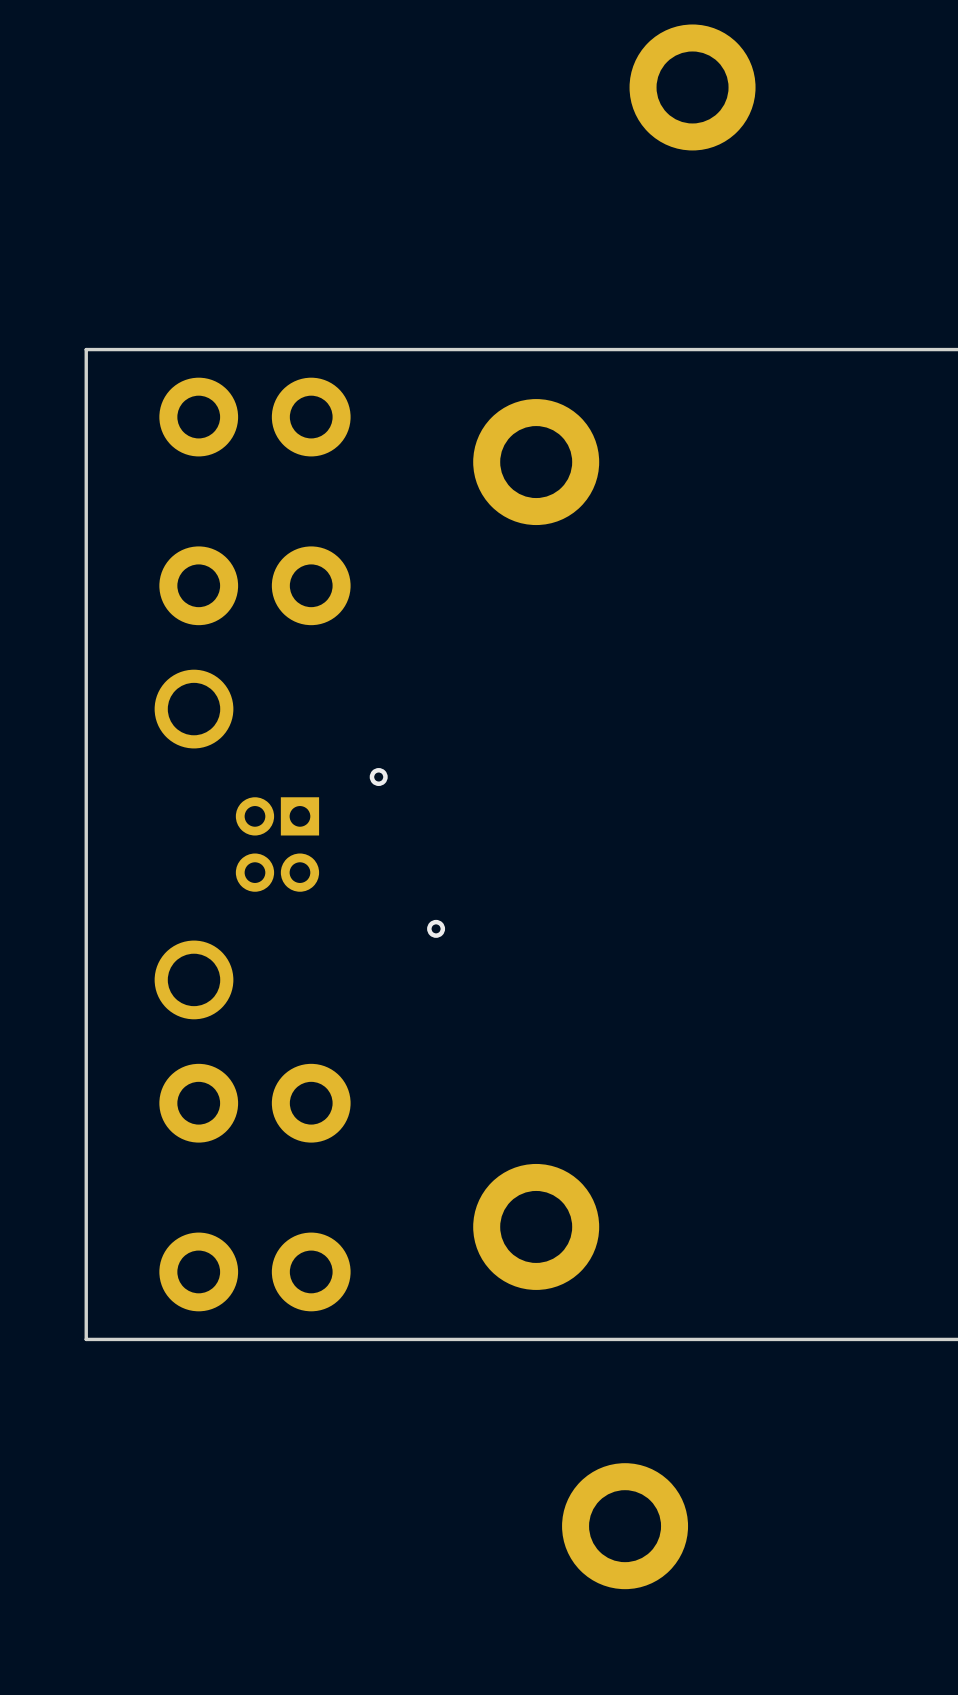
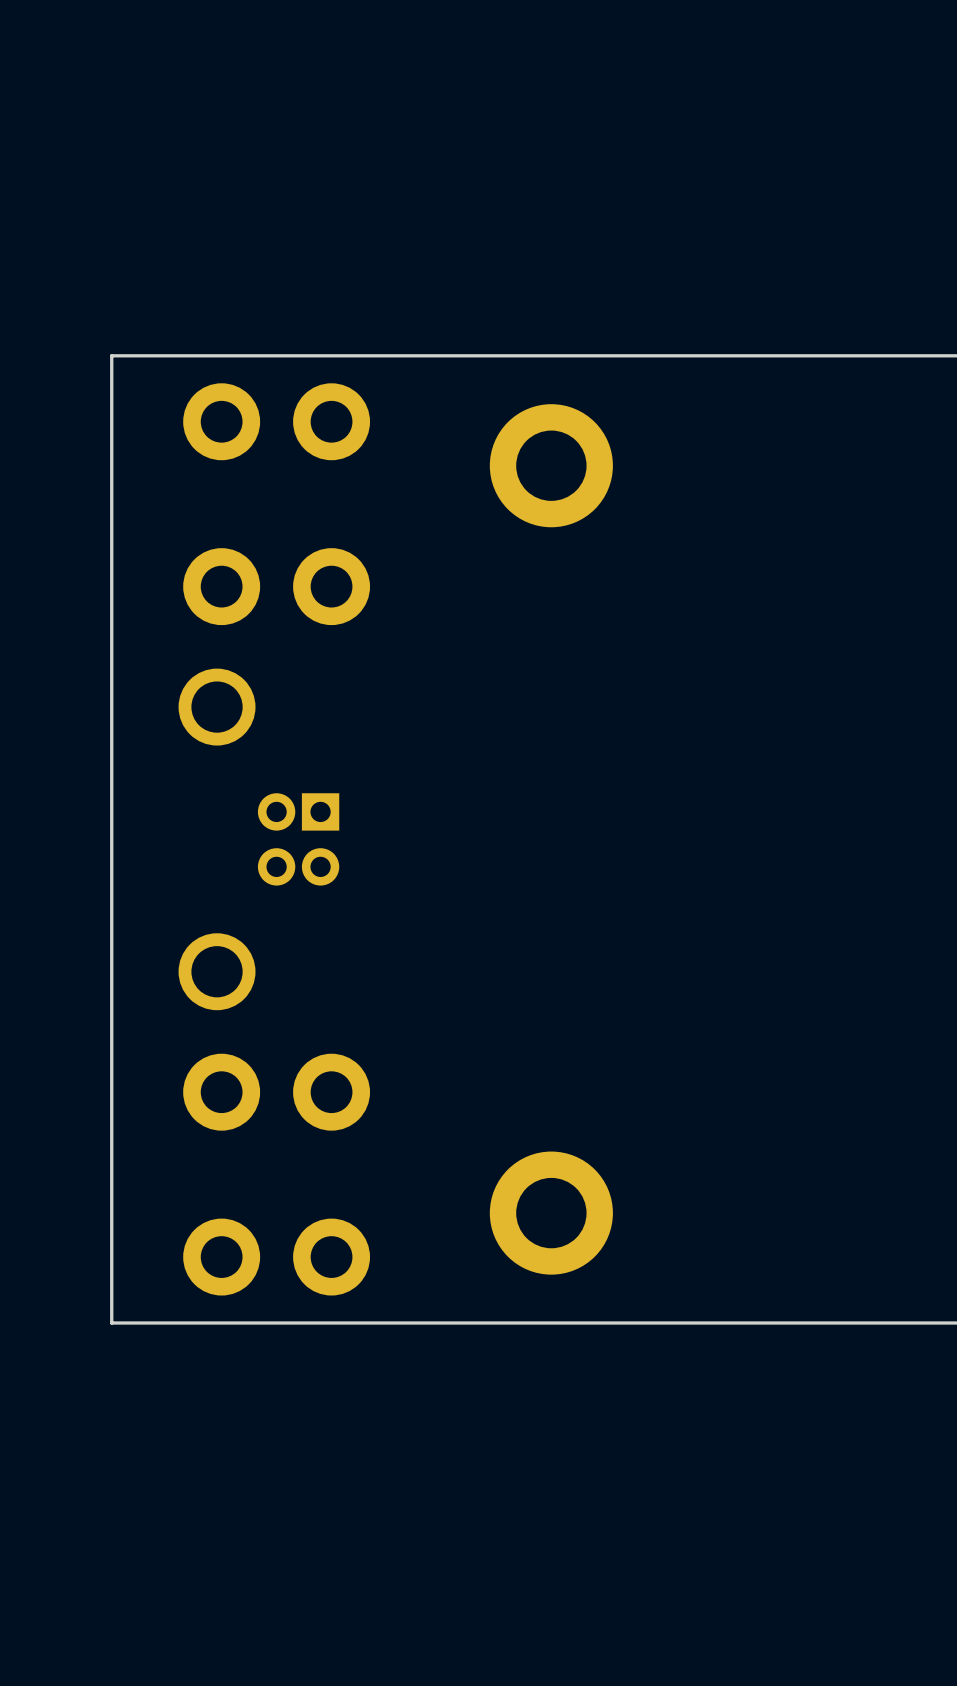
part: (692, 87) -> none
via: (378, 777) -> none
via: (436, 928) -> none
part: (625, 1526) -> none

